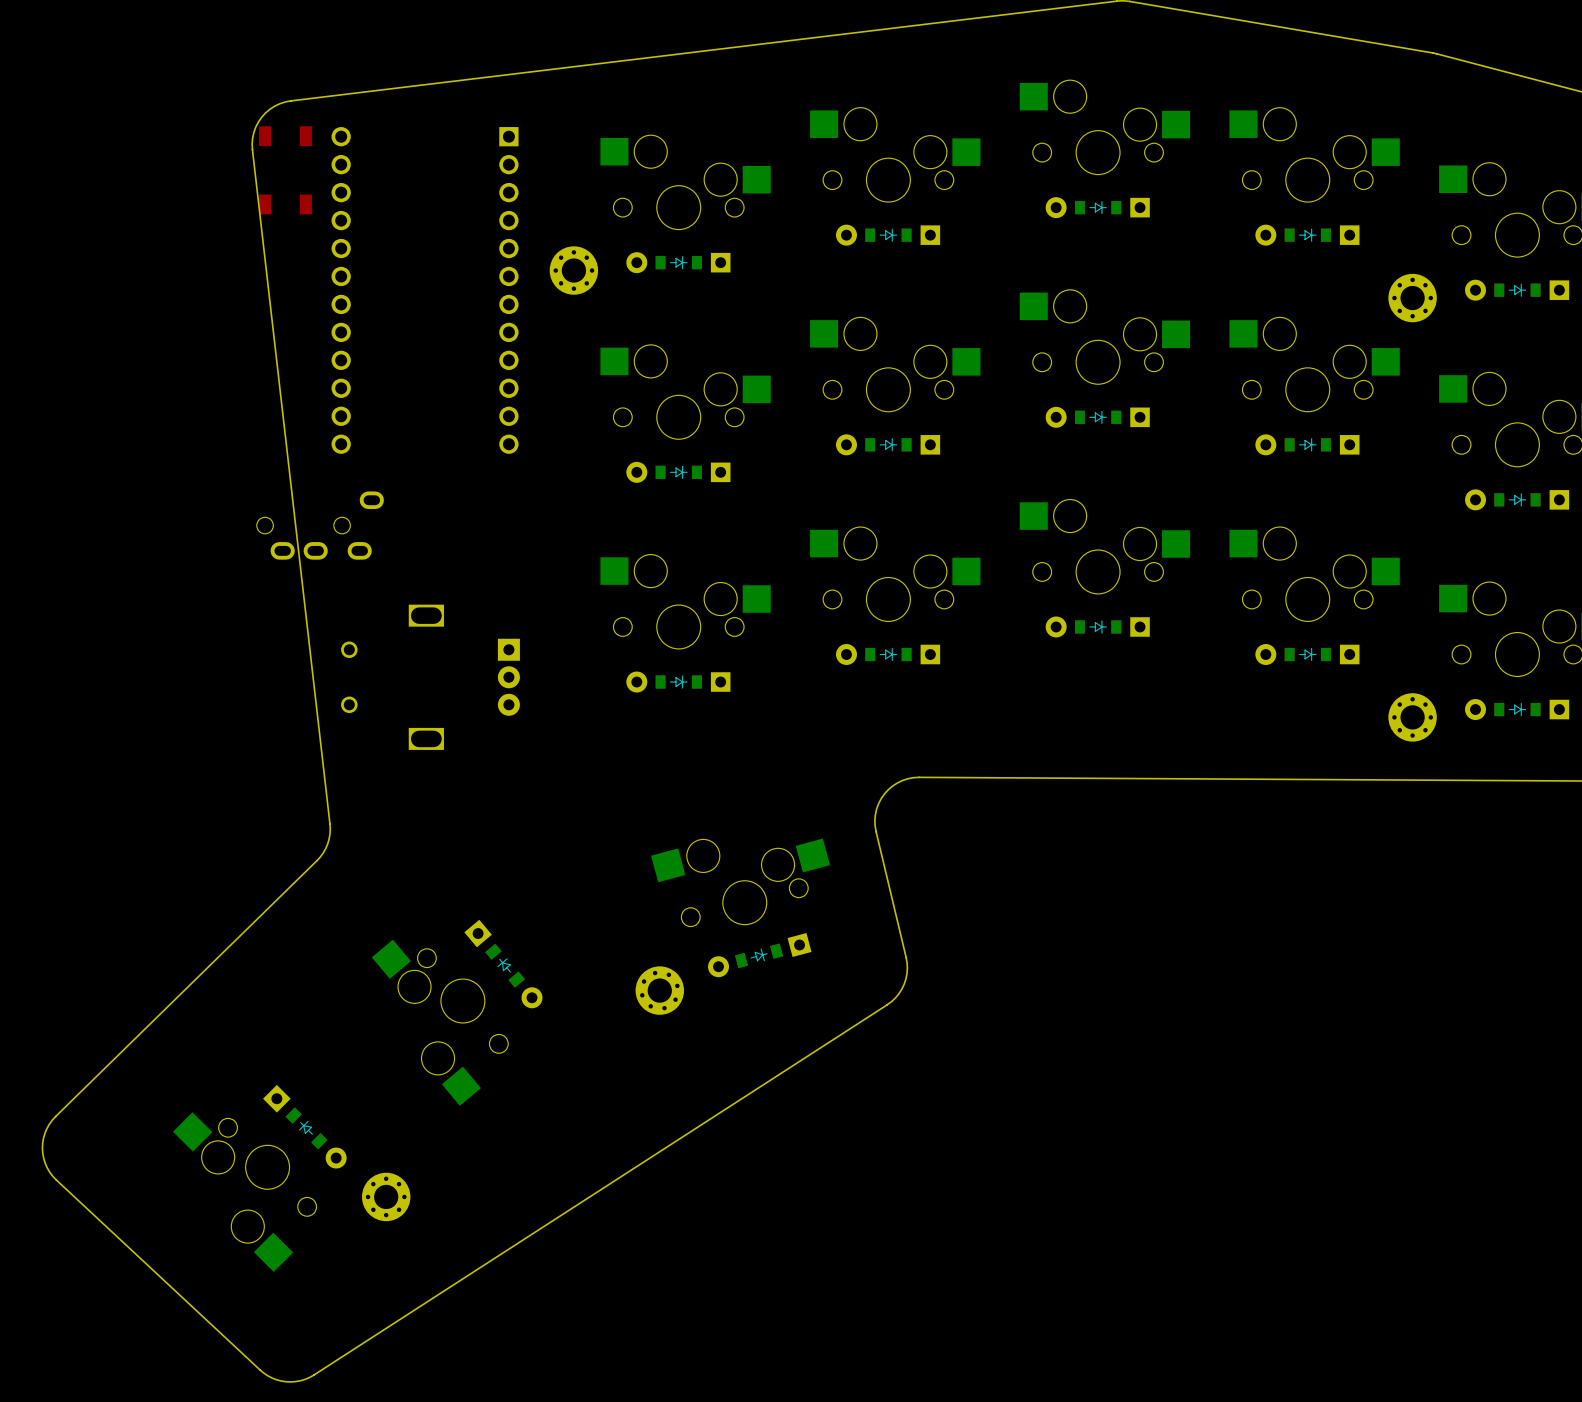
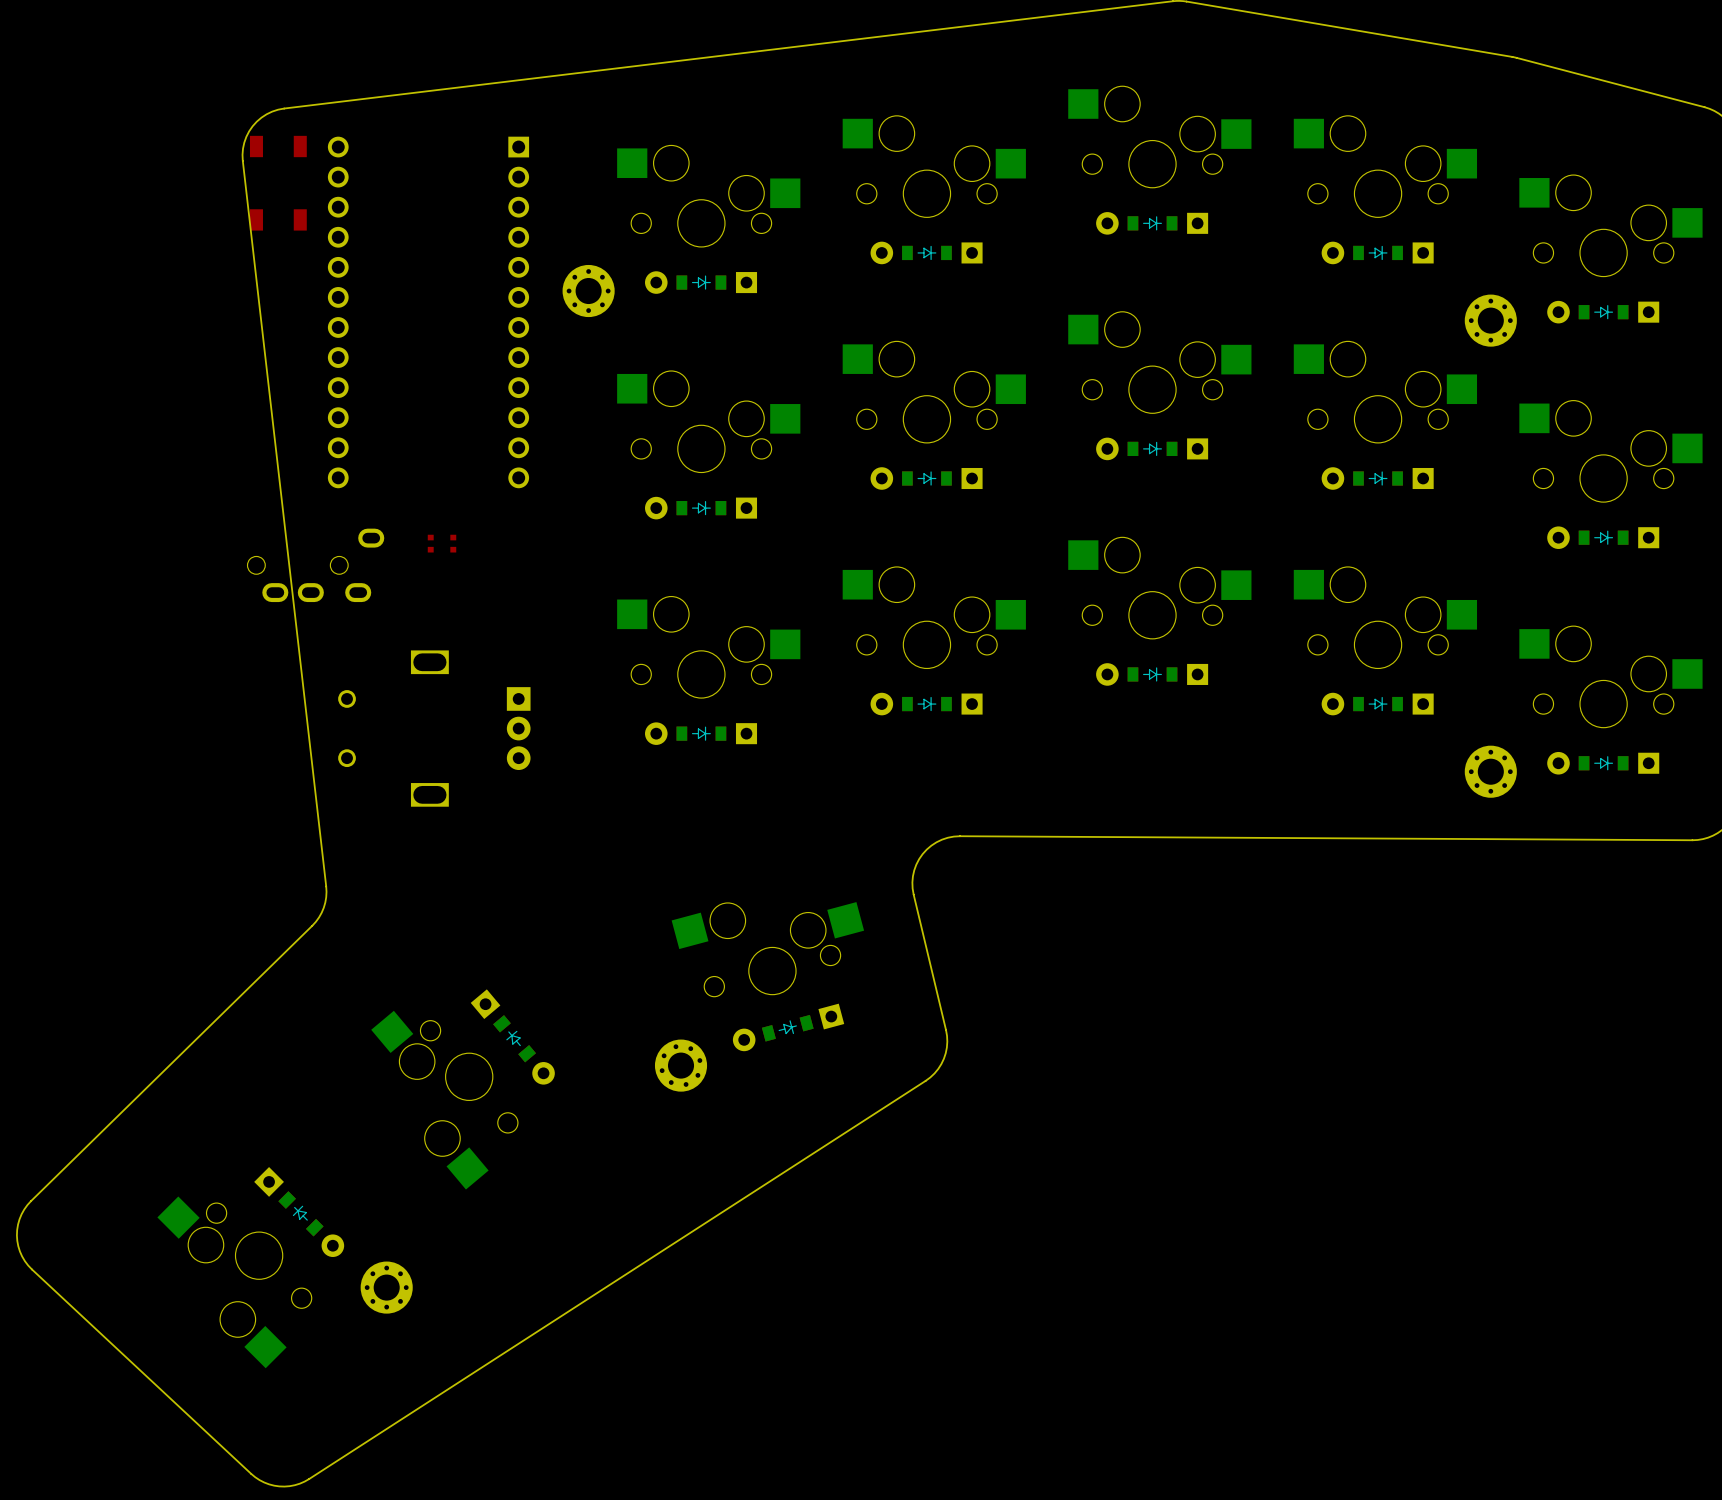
part: none -> (430, 543)
part: none -> (453, 543)

